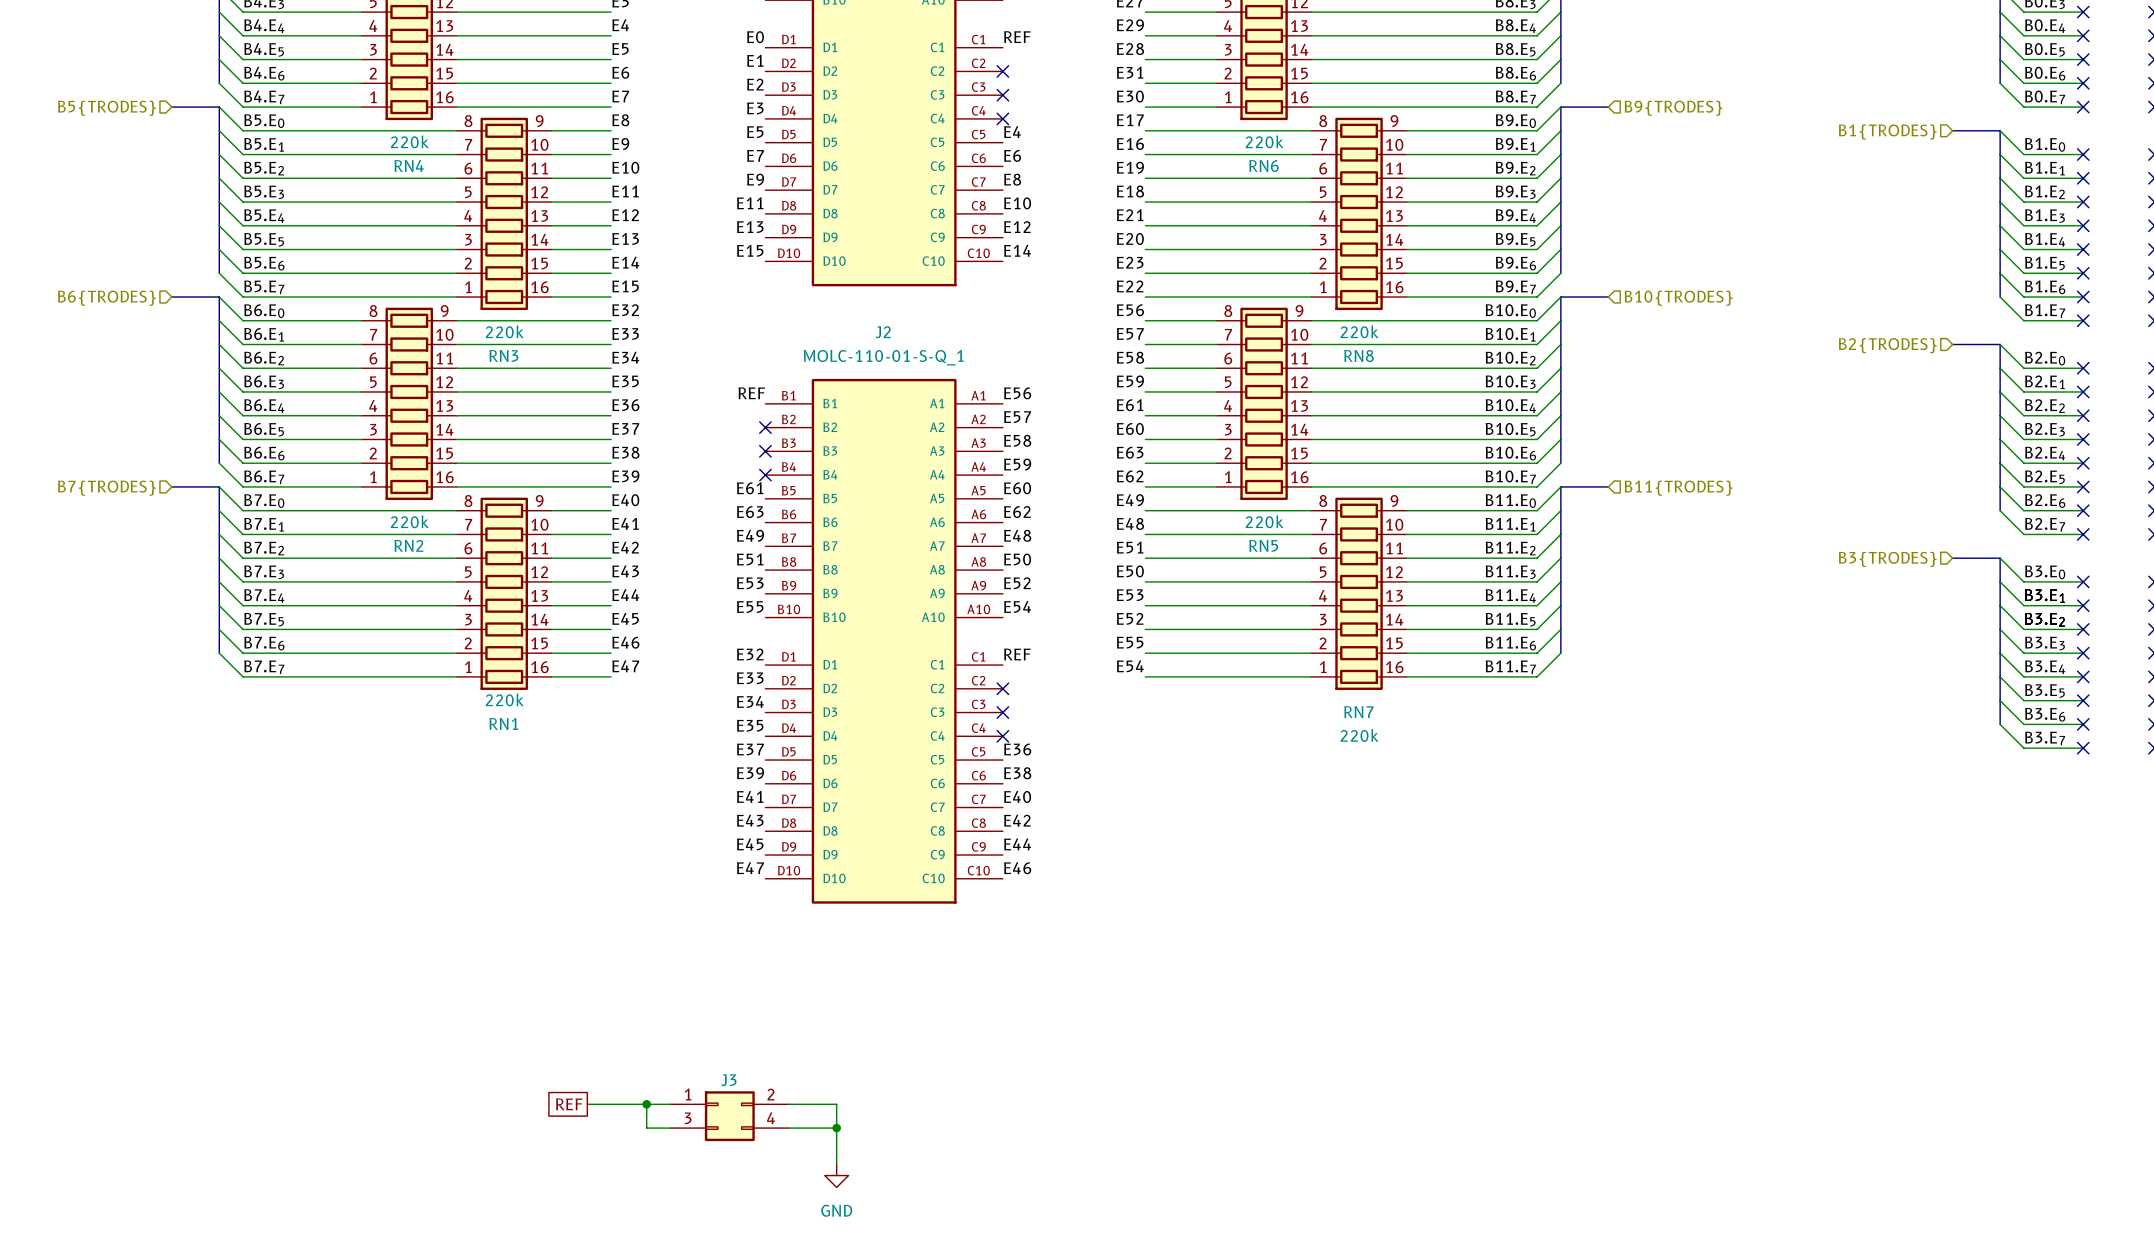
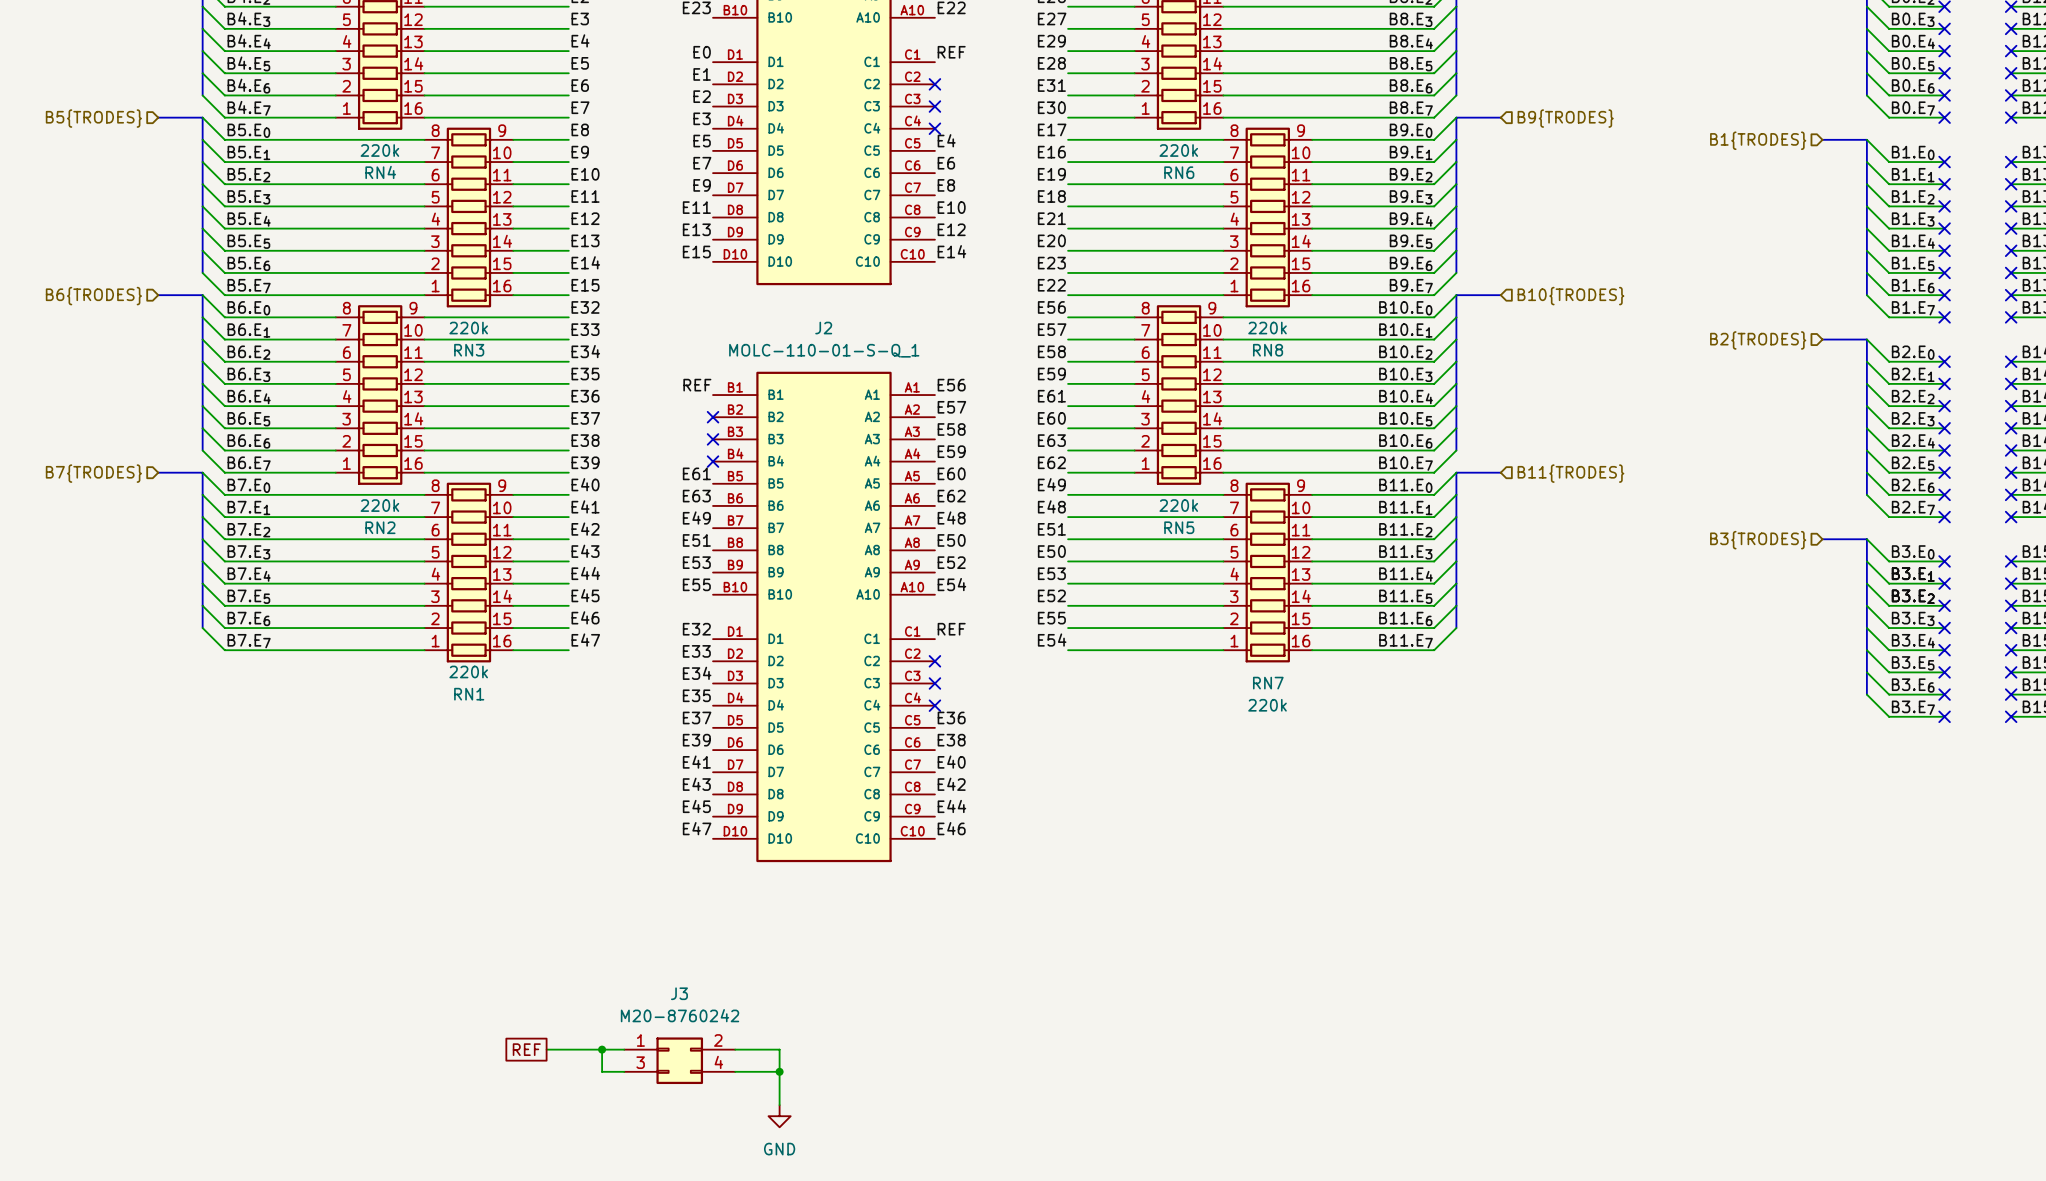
J3 value: none -> M20-8760242 (680, 1015)
J3 name position: J3 (728, 1080) -> J3 (679, 993)

